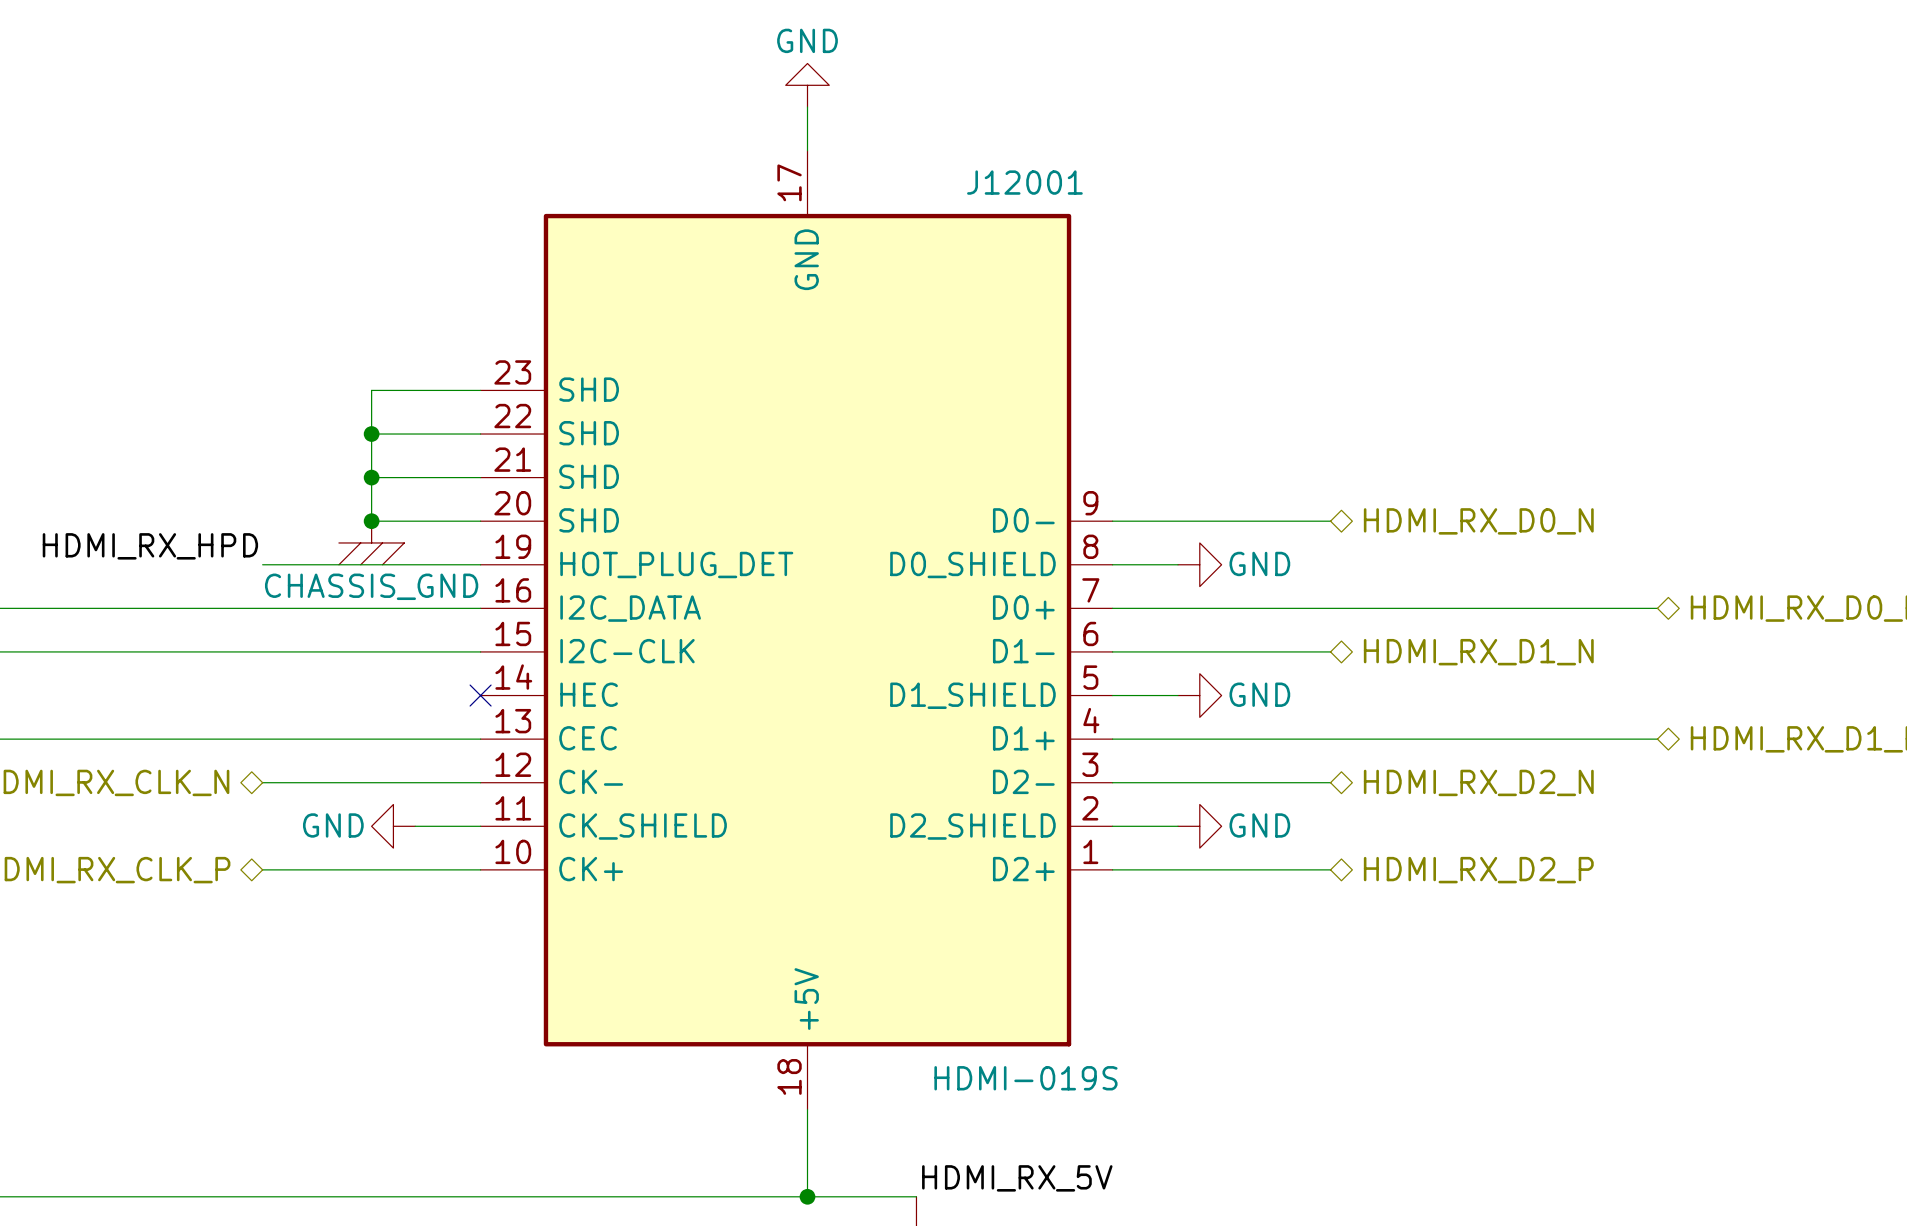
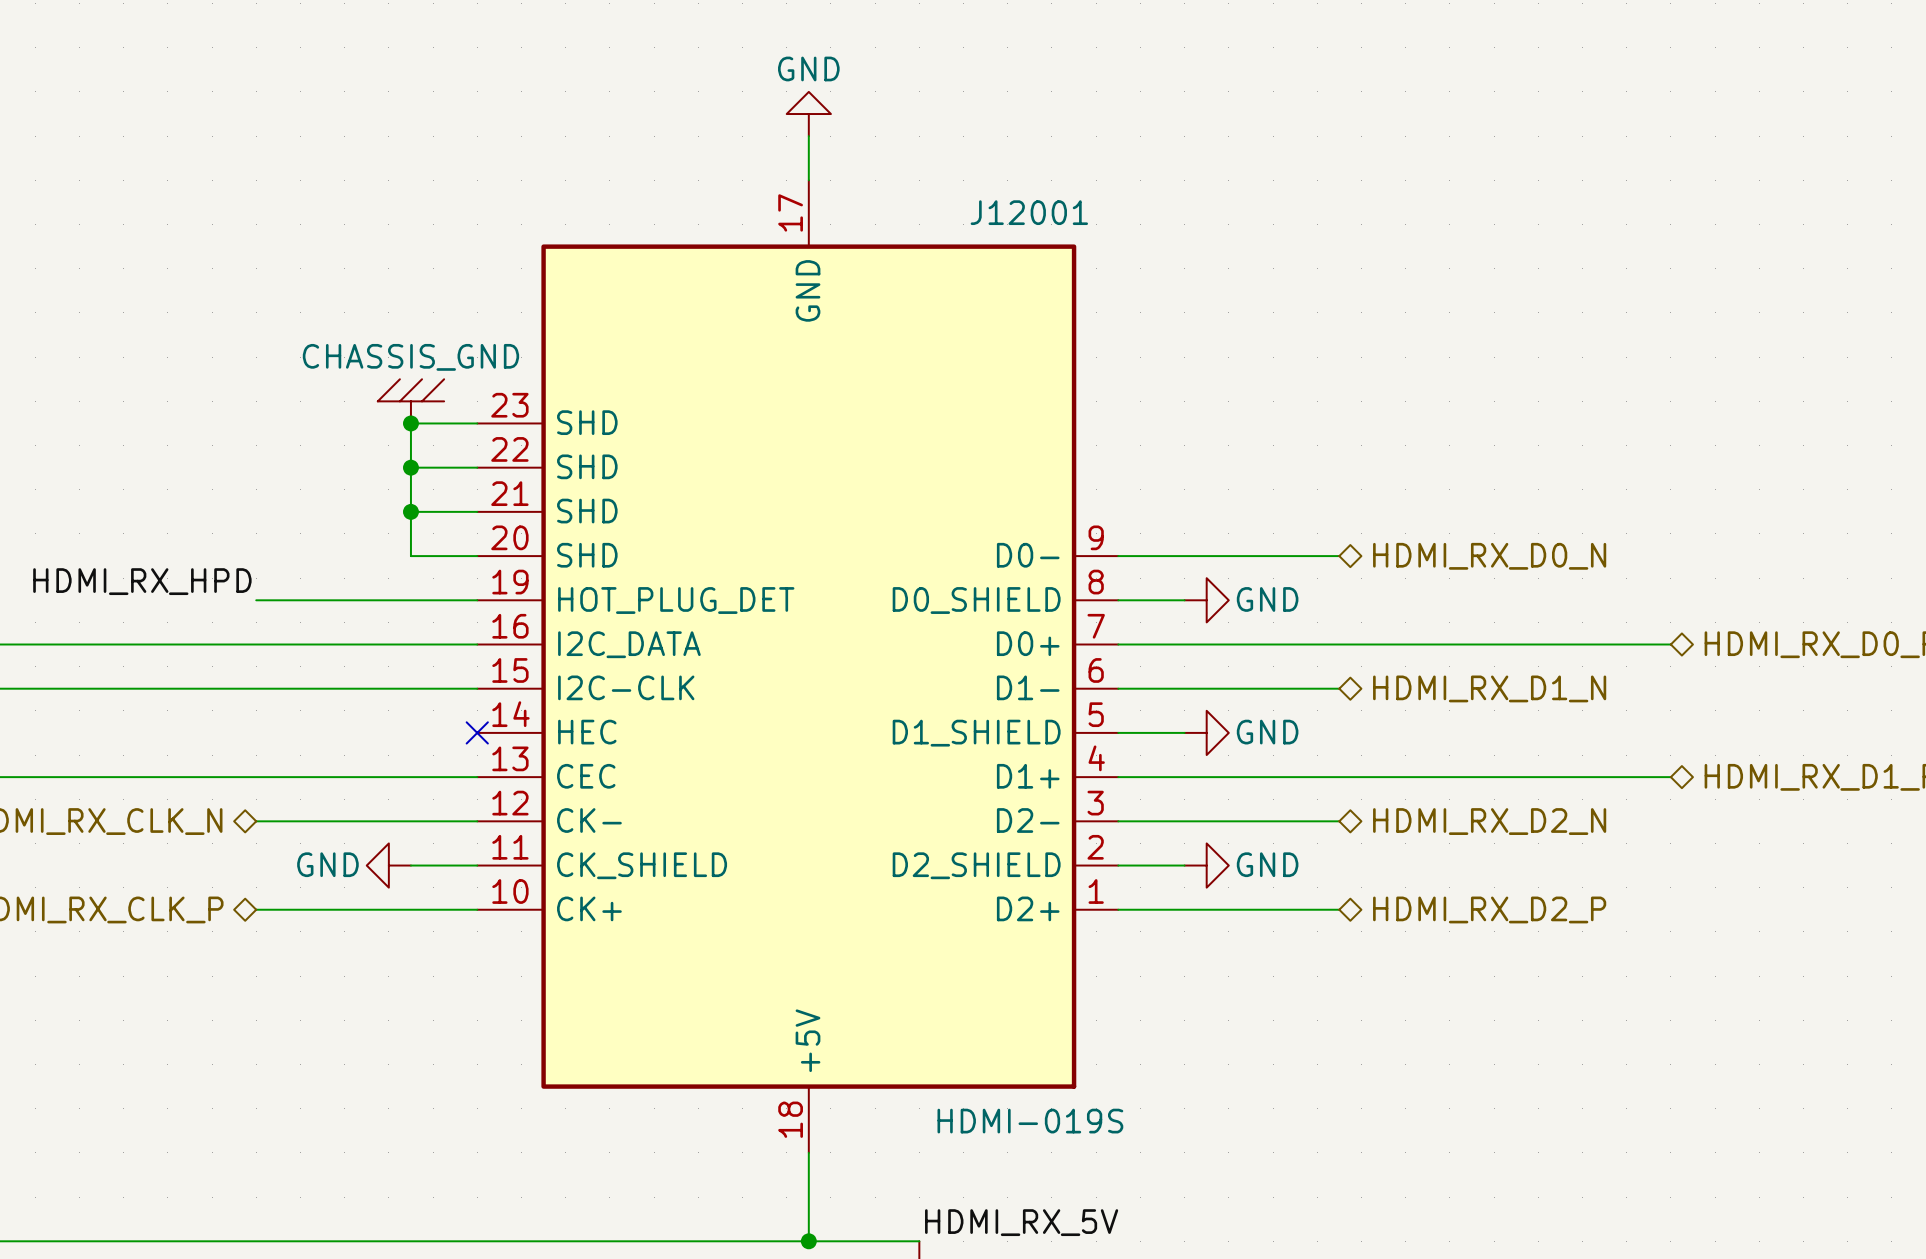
wire: (415, 390) (371, 390) (371, 521) (415, 521) -> (410, 423) (410, 556)
junction: none -> (410, 423)
wire: (371, 434) (415, 434) -> none
junction: (371, 434) -> none
junction: none -> (410, 467)
wire: (371, 477) (415, 477) -> none
junction: (371, 477) -> none
junction: none -> (410, 511)
junction: (371, 521) -> none
power symbol rotation: 0° (371, 542) -> 180° (410, 401)
power symbol position: CHASSIS_GND (371, 542) -> CHASSIS_GND (410, 401)

